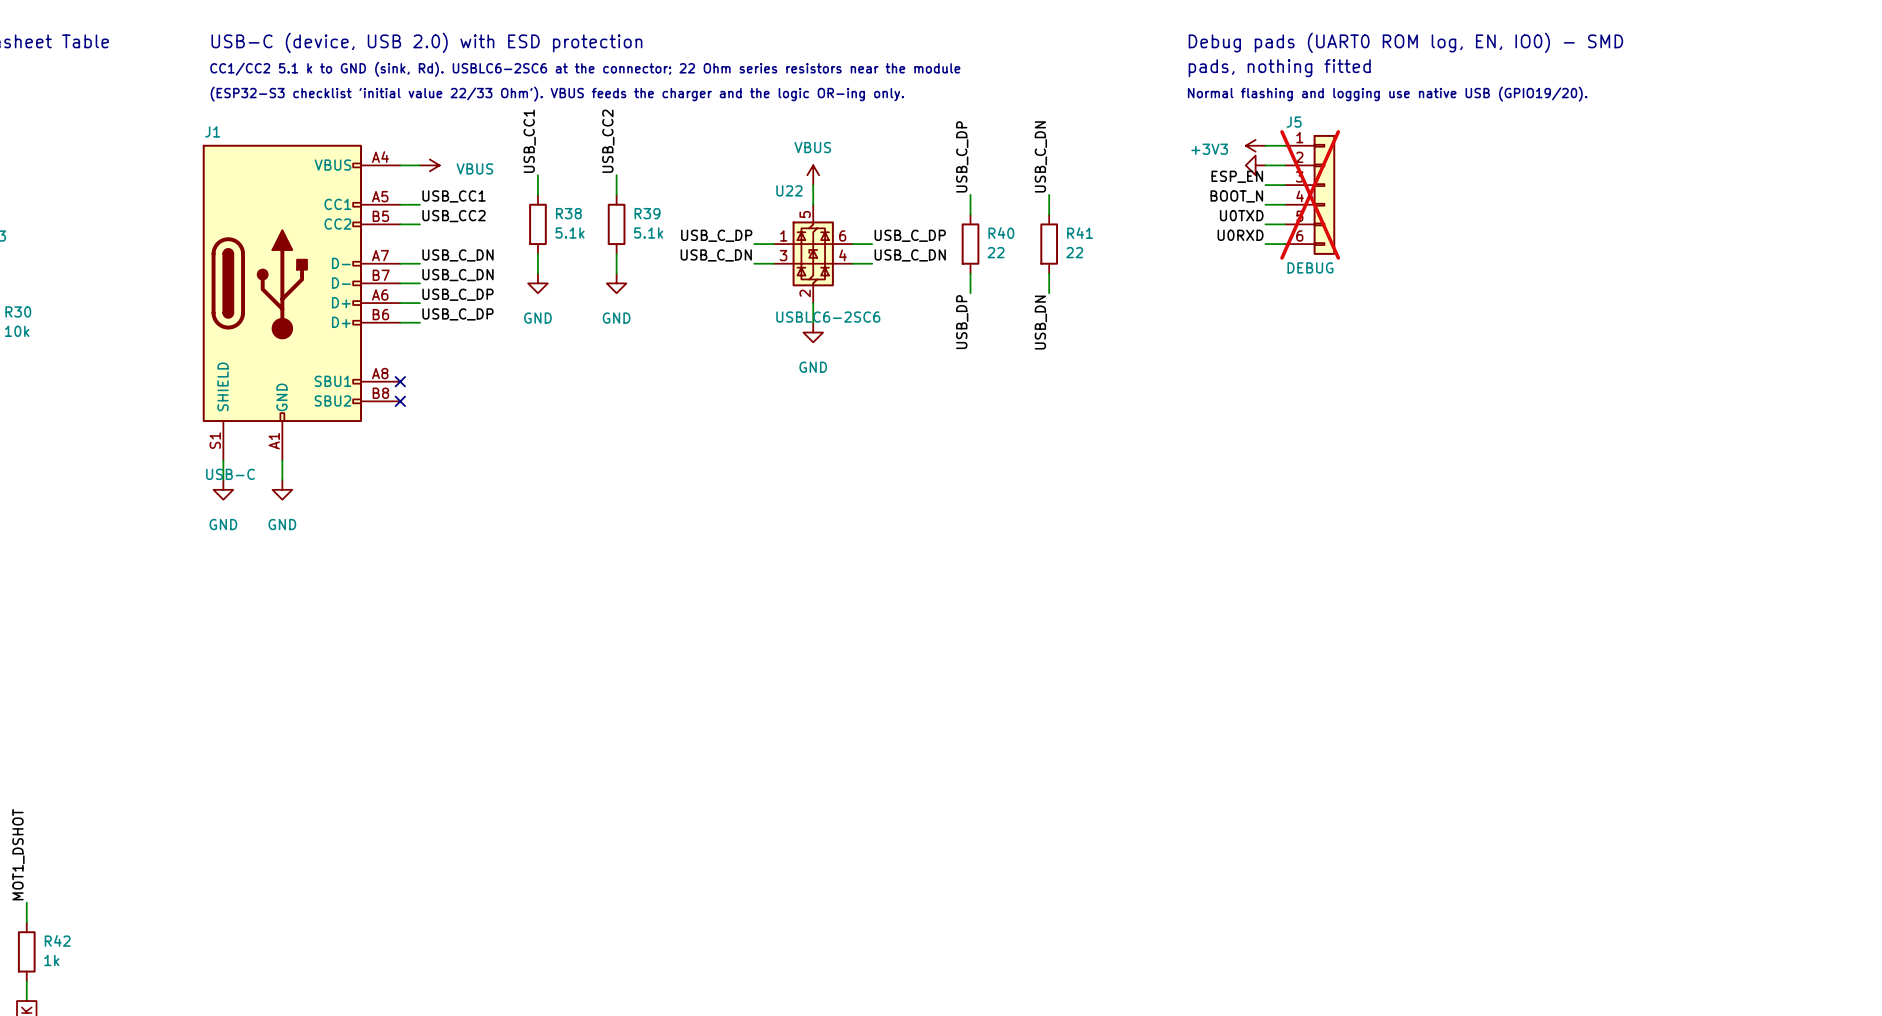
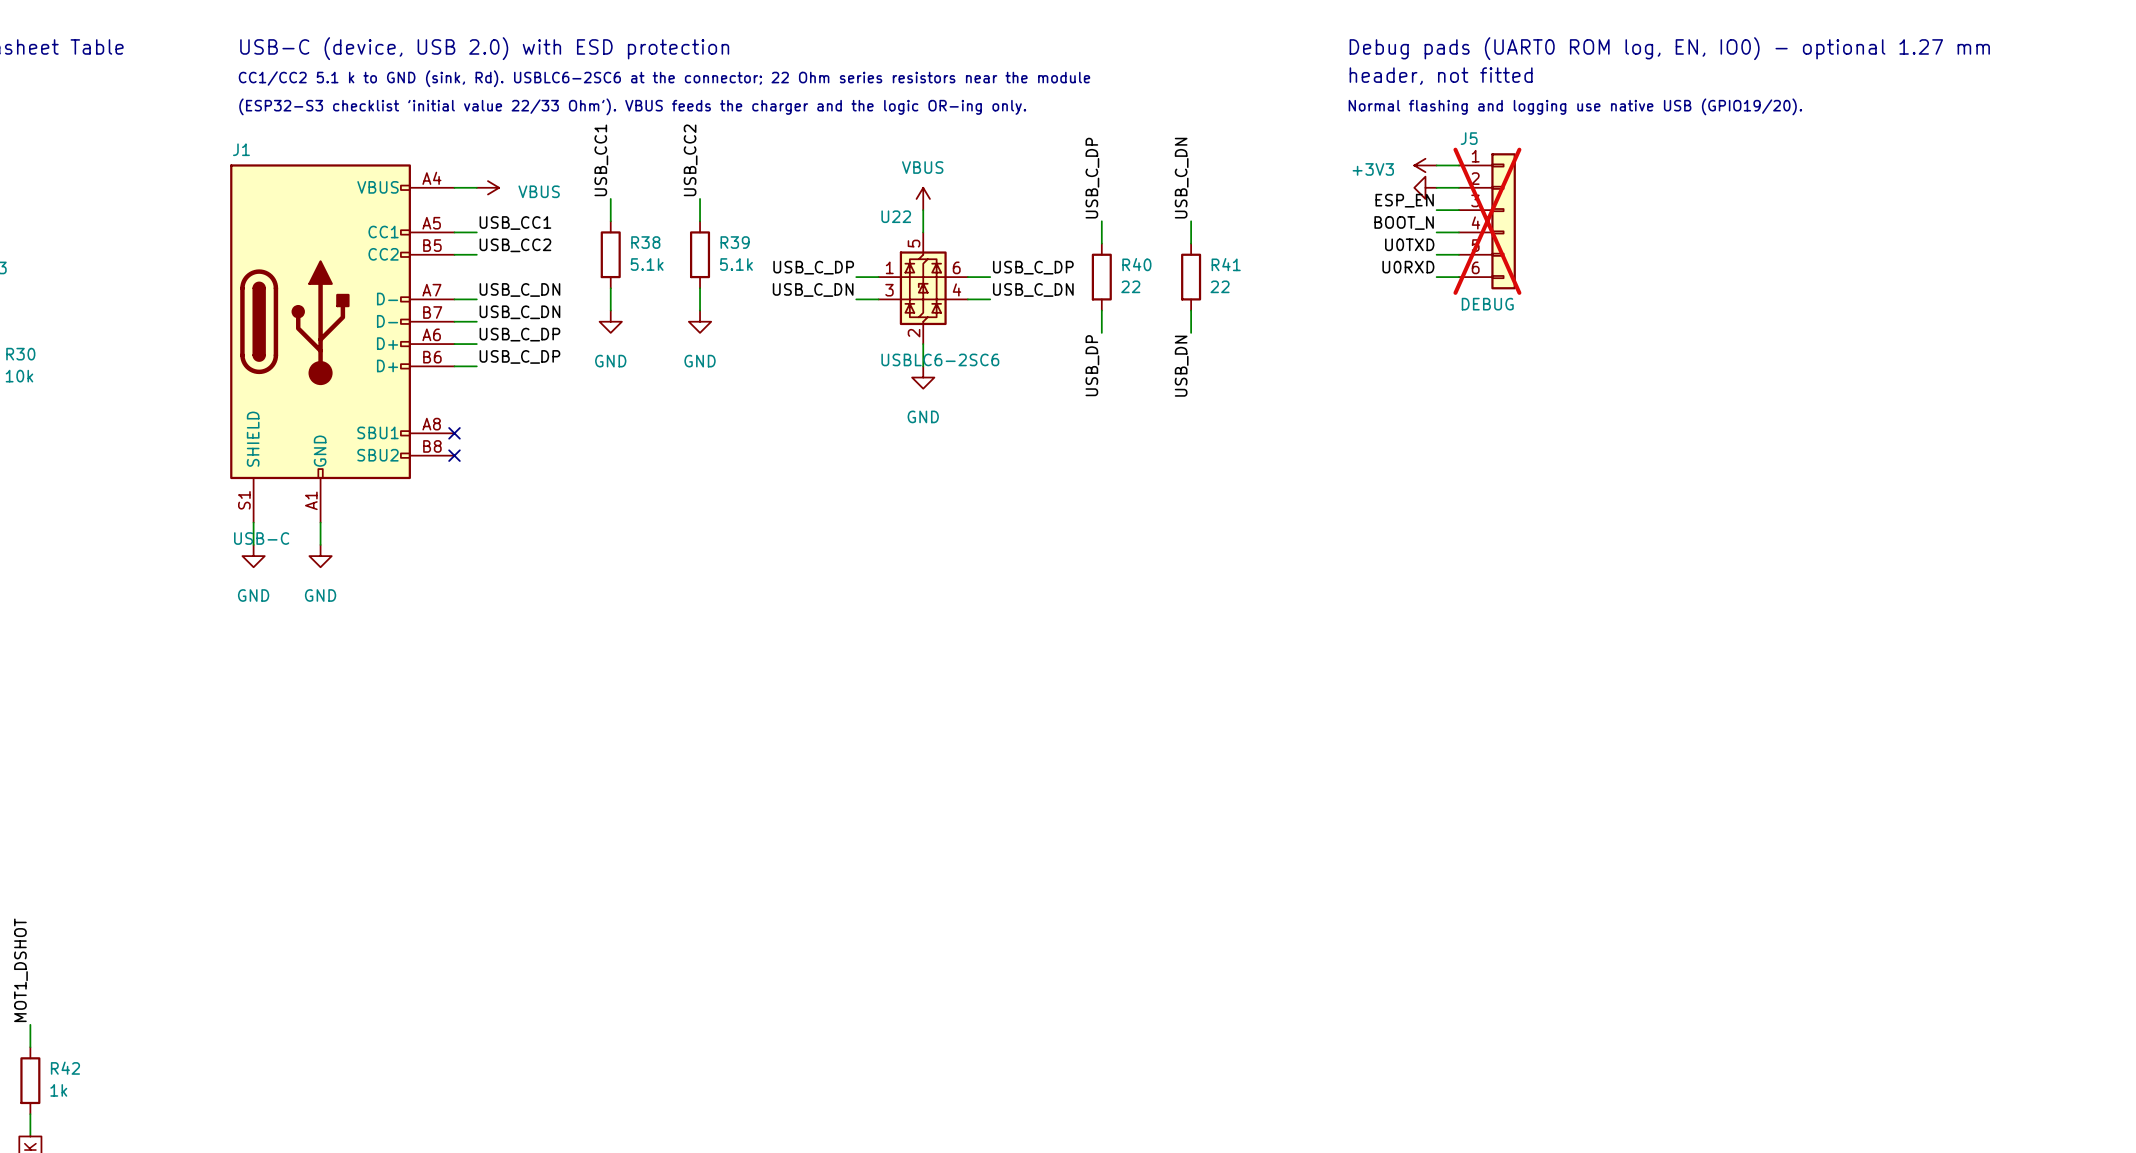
text: Debug pads (UART0 ROM log, EN, IO0) - SMD (1405, 42) -> Debug pads (UART0 ROM log, EN, IO0) - optional 1.27 mm (1669, 48)
text: pads, nothing fitted (1279, 68) -> header, not fitted (1441, 76)

